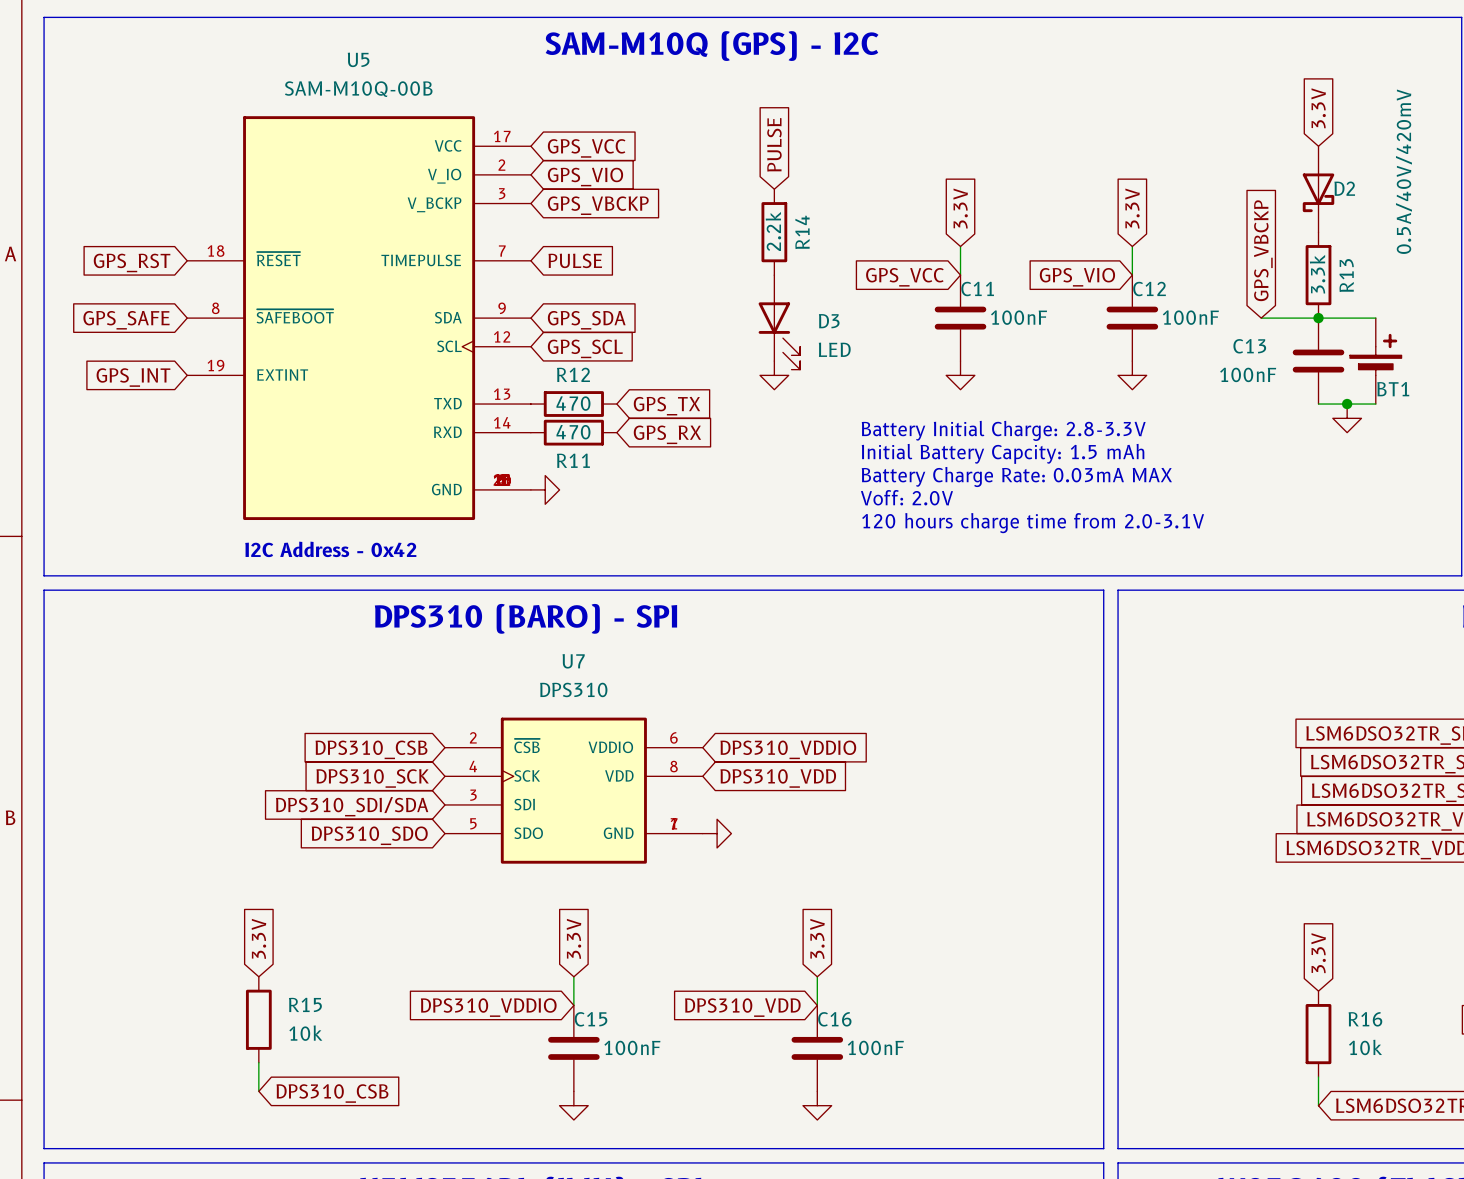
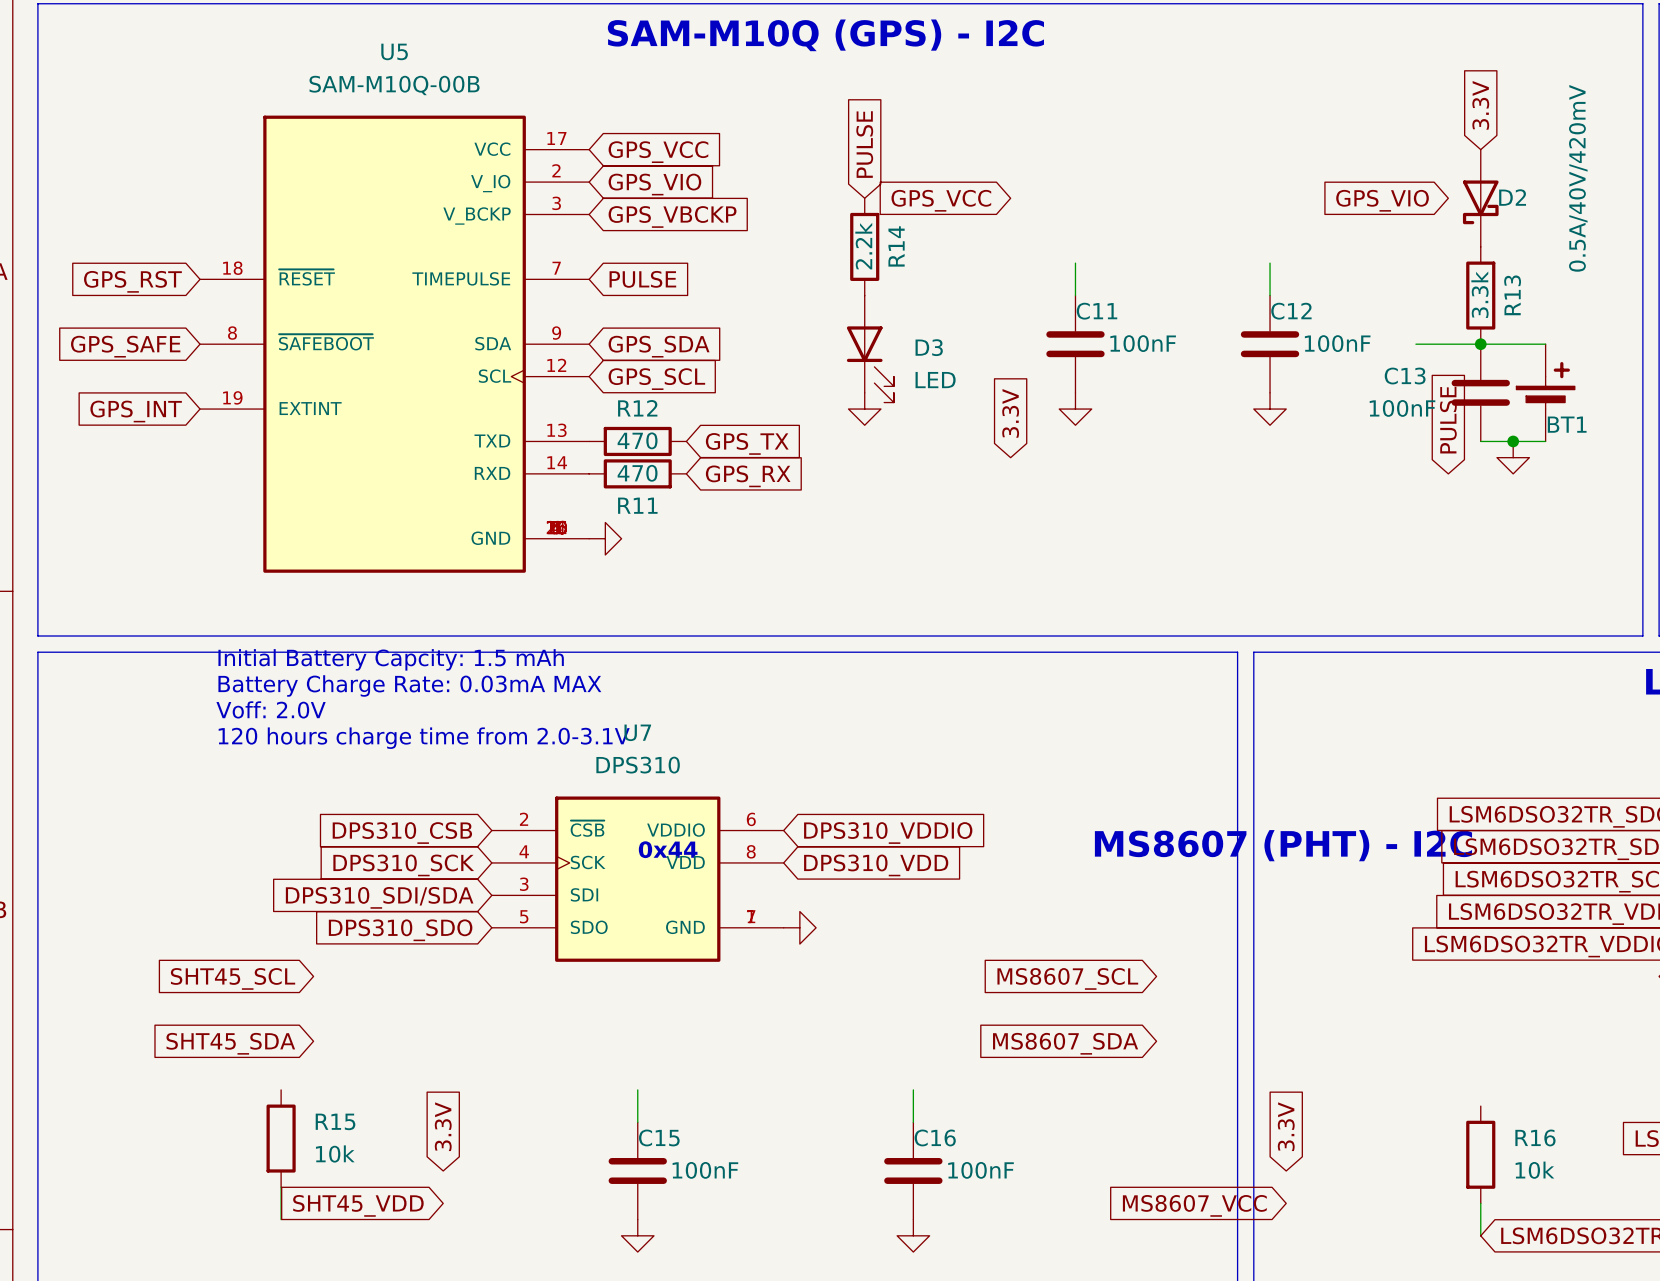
global label: 3.3V (960, 208) -> none
global label: 3.3V (1132, 208) -> none
global label: GPS_VBCKP (1263, 250) -> none
global label position: GPS_VCC (904, 277) -> GPS_VCC (941, 200)
global label position: GPS_VIO (1077, 277) -> GPS_VIO (1382, 200)
global label: none -> 3.3V (1010, 413)
global label: none -> PULSE (1448, 420)
text: Battery Initial Charge: 2.8-3.3V (1003, 430) -> none
text: Initial Battery Capcity: 1.5 mAh (1003, 453) -> none
text: Battery Charge Rate: 0.03mA MAX (1016, 477) -> none
text: Voff: 2.0V (906, 497) -> none
text: 120 hours charge time from 2.0-3.1V (1033, 523) -> none
text: I2C Address - 0x42 (330, 549) -> none
text: none -> Initial Battery Capcity: 1.5 mAh (391, 659)
text: DPS310 (BARO) - SPI (525, 618) -> none
text: none -> Battery Charge Rate: 0.03mA MAX (409, 685)
text: none -> Voff: 2.0V (271, 709)
text: none -> 120 hours charge time from 2.0-3.1V (424, 738)
text: none -> MS8607 (PHT) - I2C (1283, 845)
text: none -> 0x44 (668, 849)
global label: none -> SHT45_SCL (233, 978)
global label: none -> MS8607_SCL (1067, 978)
global label: none -> SHT45_SDA (230, 1043)
global label: none -> MS8607_SDA (1065, 1043)
global label: 3.3V (258, 938) -> none
global label: 3.3V (573, 938) -> none
global label: 3.3V (817, 938) -> none
global label: 3.3V (1318, 953) -> none
global label: DPS310_VDDIO (488, 1007) -> none
global label: DPS310_VDD (742, 1007) -> none
global label: none -> 3.3V (443, 1126)
global label: none -> 3.3V (1286, 1126)
global label: none -> SHT45_VDD (358, 1205)
global label: none -> MS8607_VCC (1194, 1205)
global label: DPS310_CSB (332, 1093) -> none

